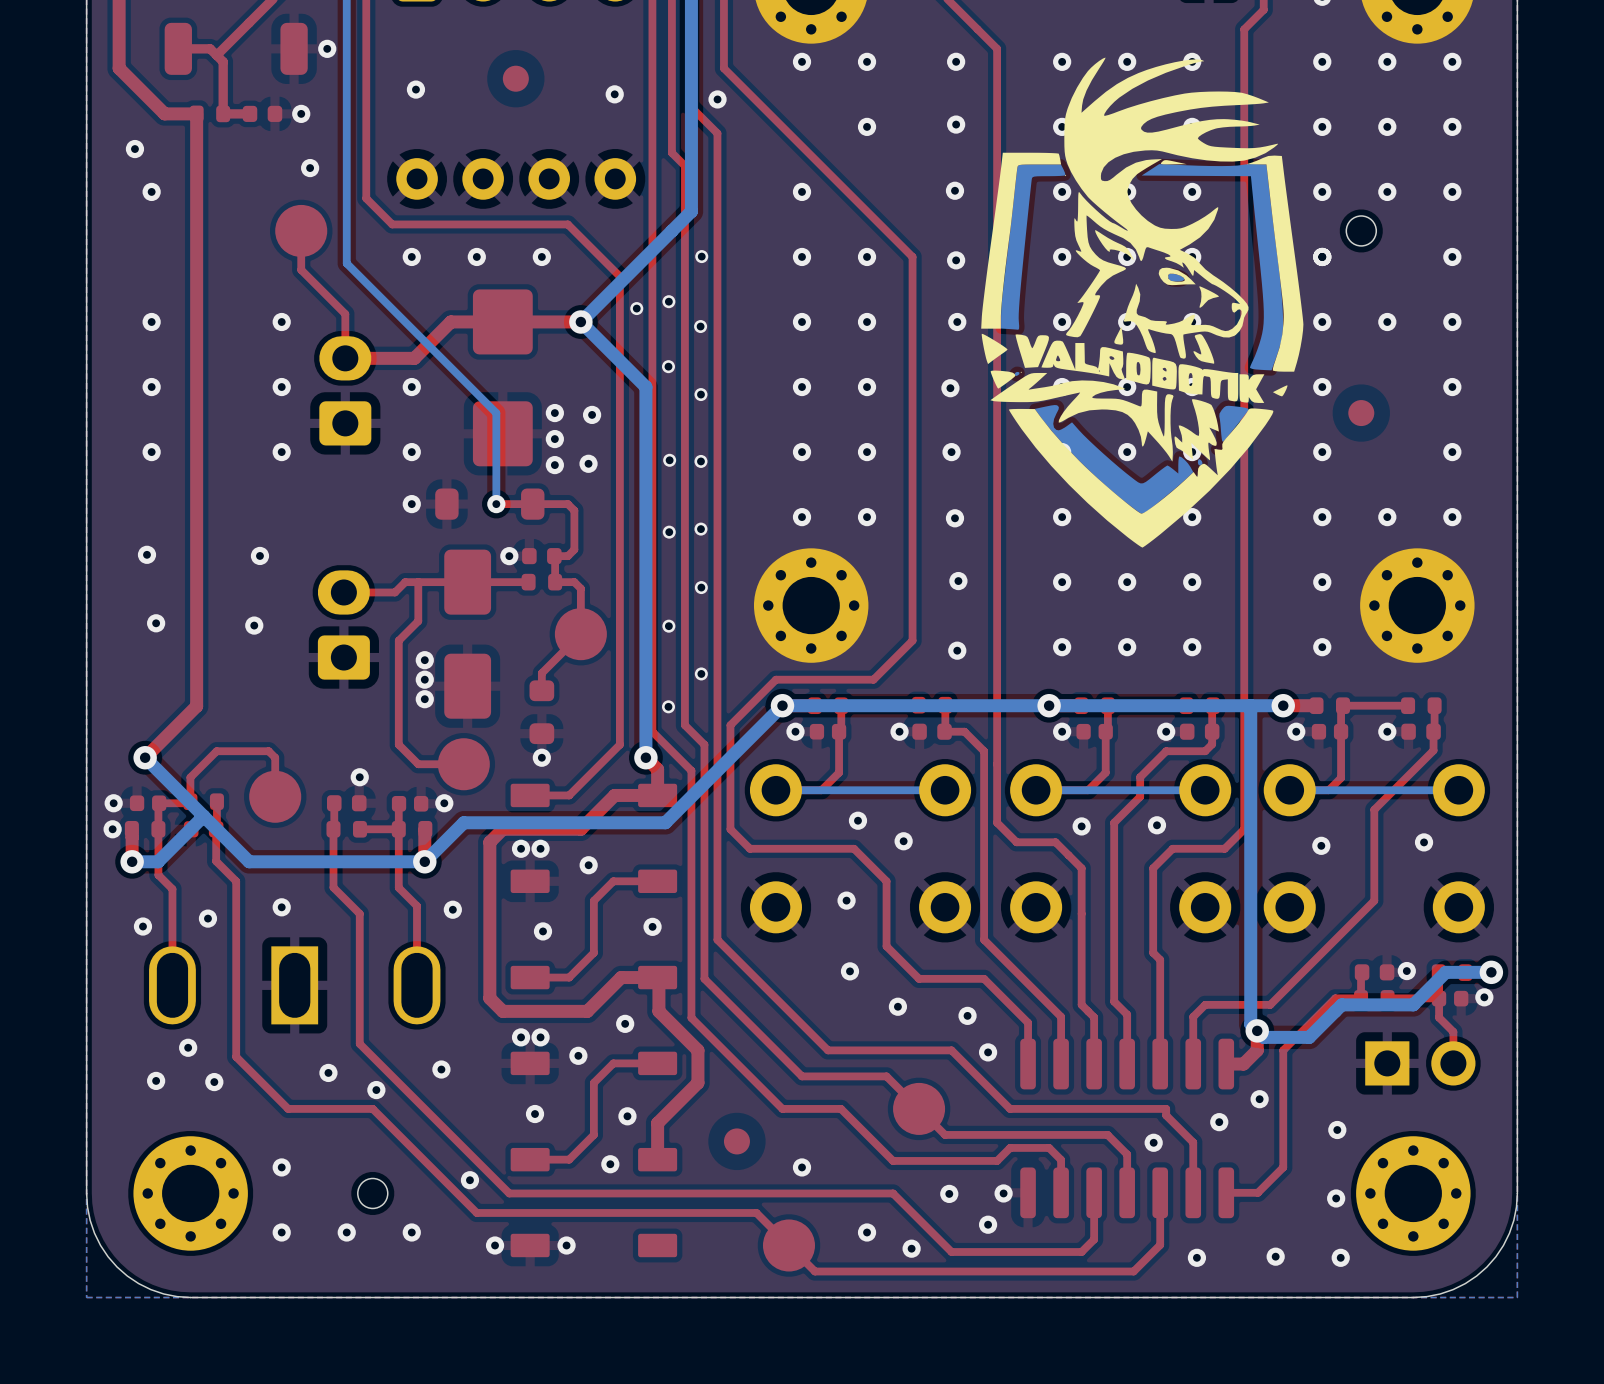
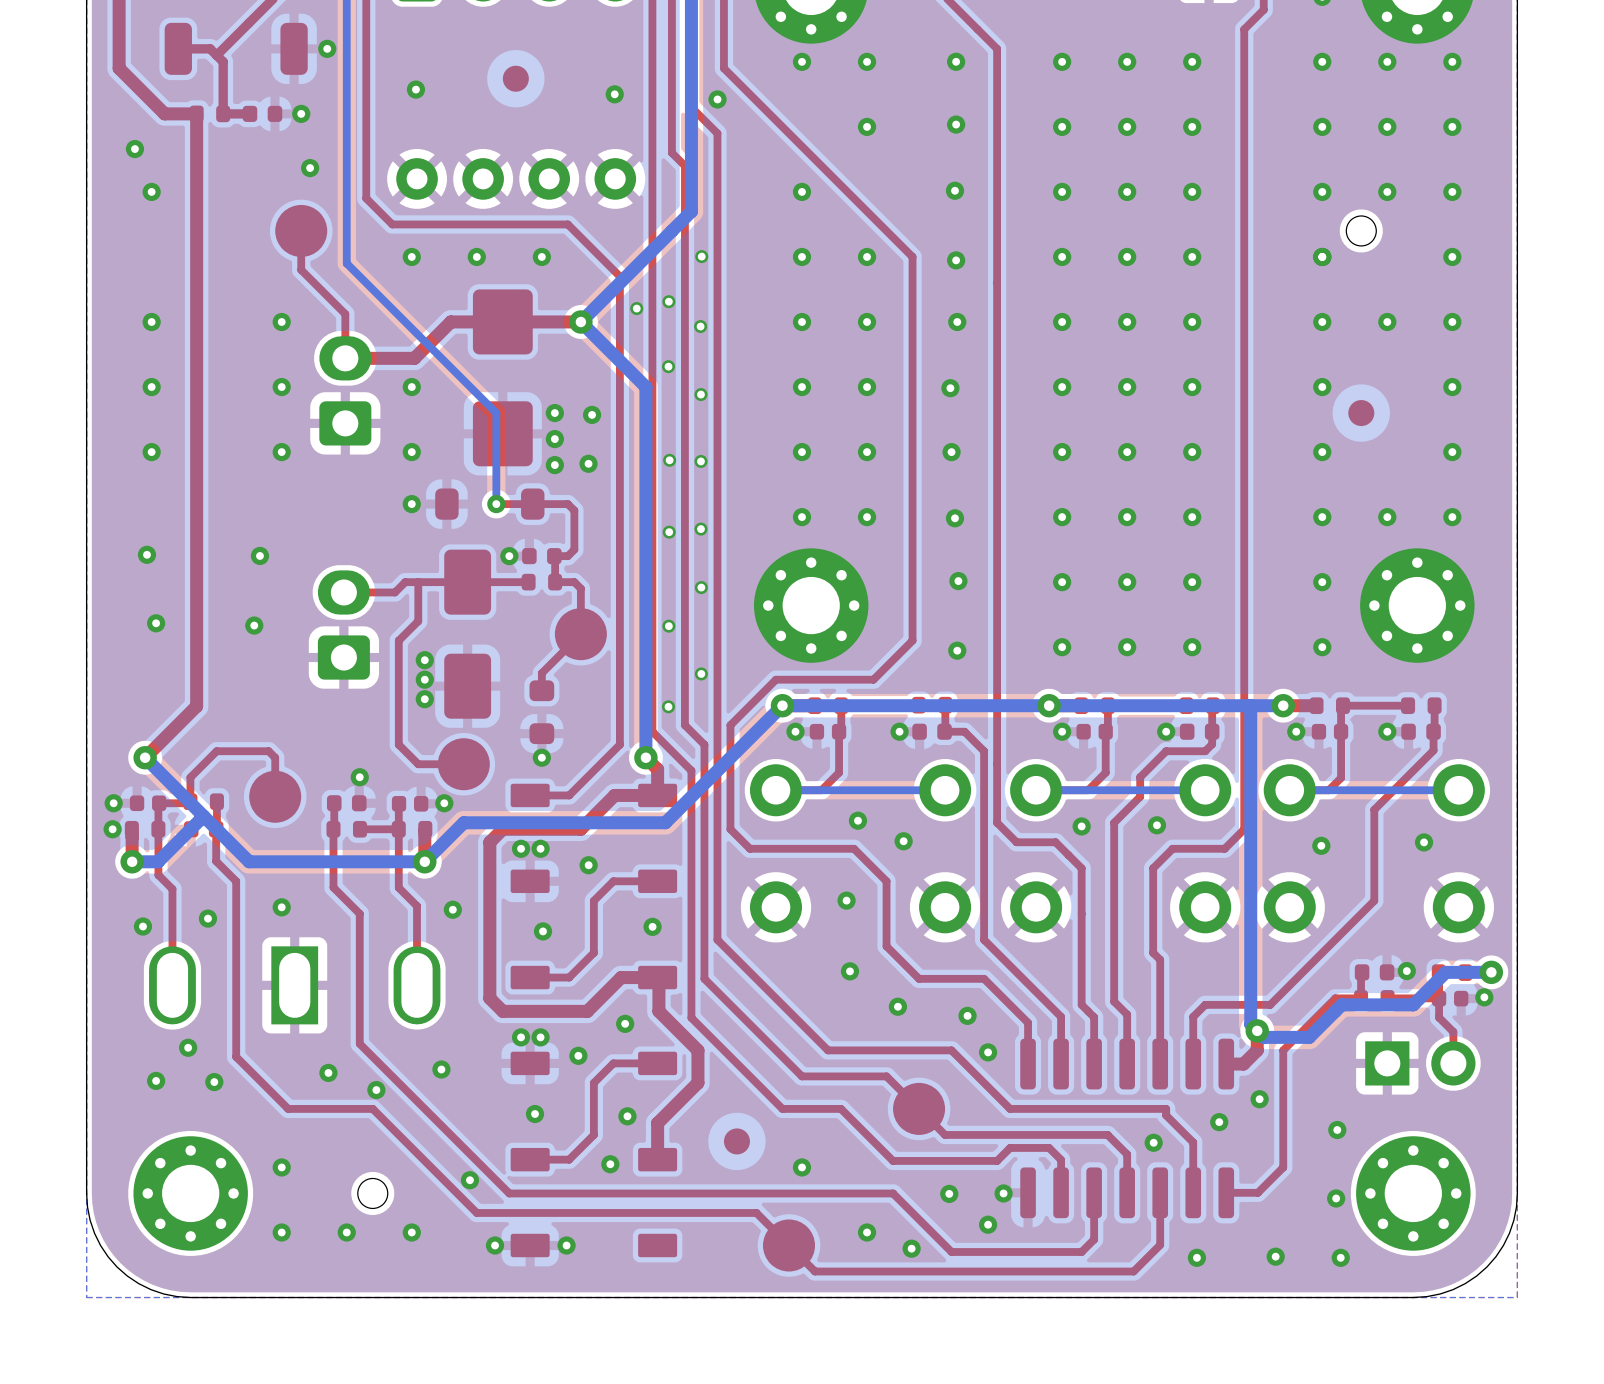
drawing: [981, 57, 1304, 548] -> none

